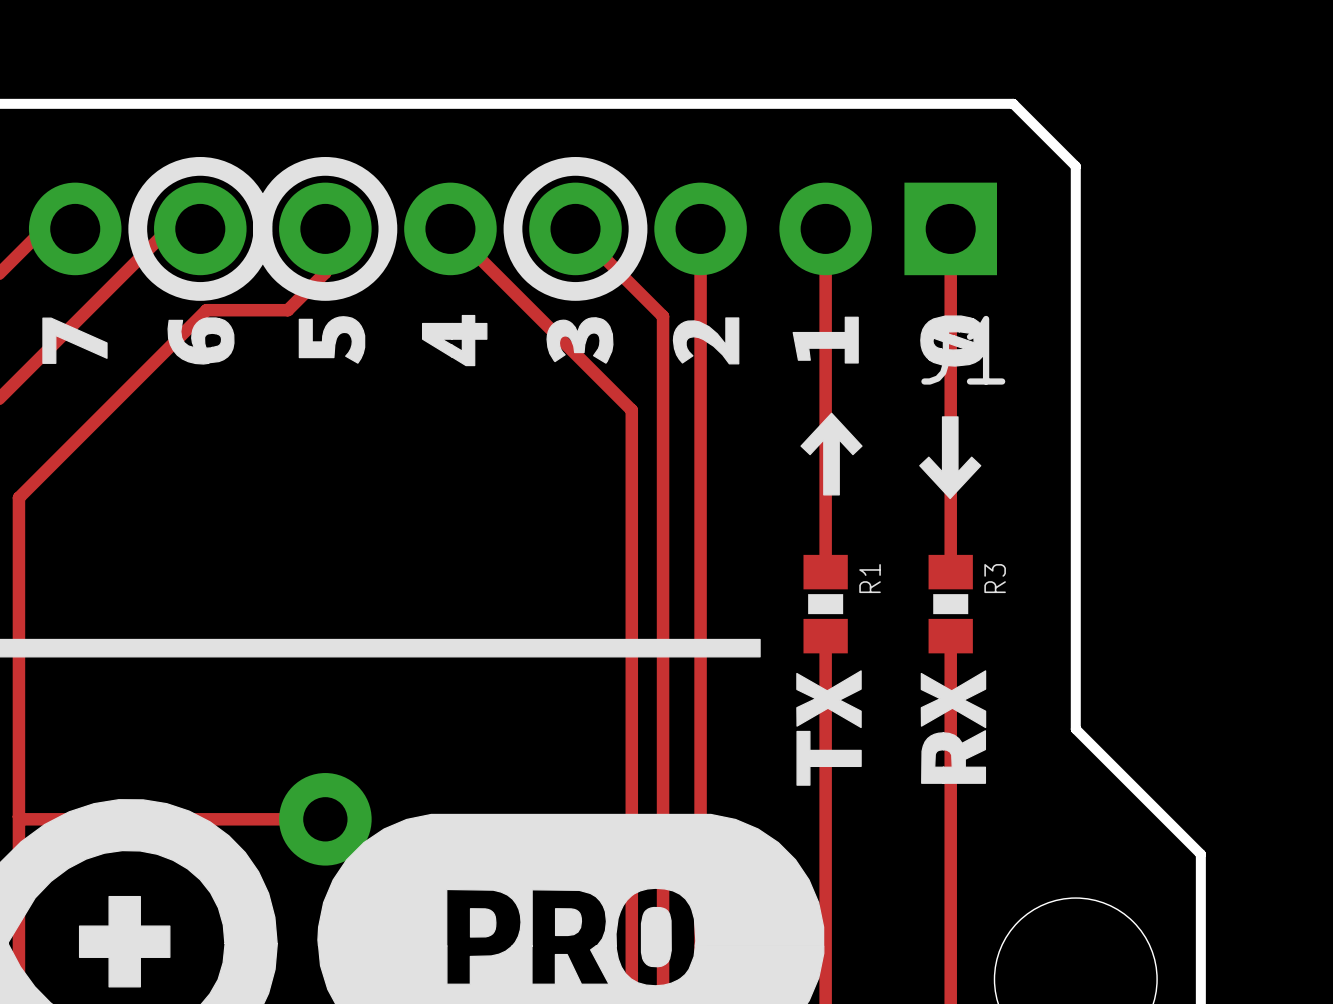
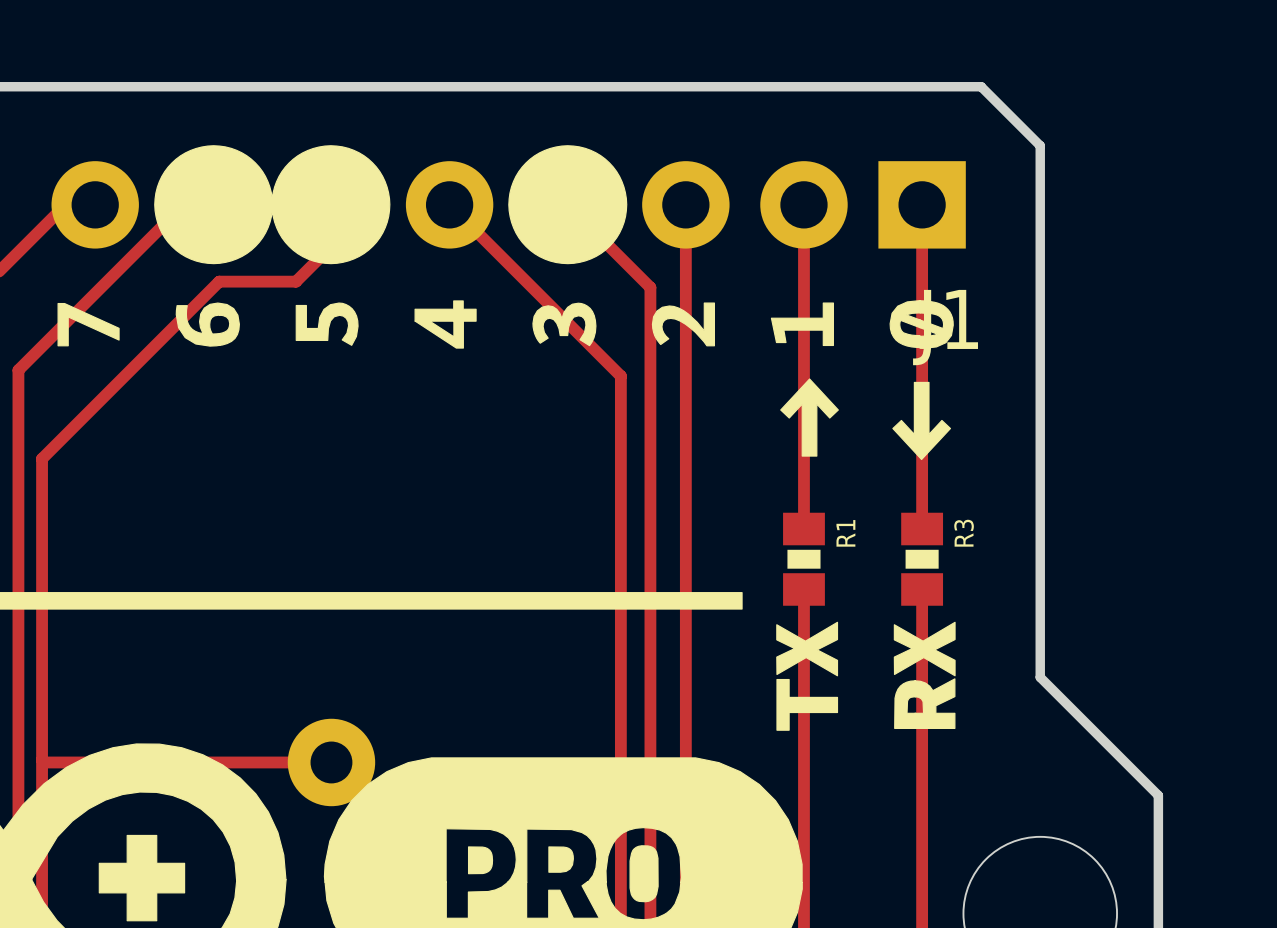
drawing shape: [128, 156, 273, 301] -> [154, 145, 274, 265]
drawing shape: [253, 156, 398, 301] -> [271, 145, 391, 265]
drawing shape: [503, 156, 648, 301] -> [508, 145, 628, 265]
drawing: [451, 314, 488, 367] -> none
drawing: [920, 315, 988, 367] -> none
drawing shape: [298, 316, 366, 364] -> [295, 302, 359, 346]
drawing shape: [792, 316, 859, 364] -> [770, 302, 835, 347]
drawing shape: [42, 317, 108, 364] -> [57, 302, 120, 347]
drawing: [167, 317, 235, 365] -> none
drawing shape: [546, 317, 614, 364] -> [532, 302, 597, 347]
drawing shape: [672, 317, 740, 365] -> [651, 302, 716, 347]
drawing shape: [421, 322, 453, 358] -> [414, 300, 477, 322]
drawing: none -> [889, 300, 954, 349]
drawing: none -> [175, 302, 240, 347]
drawing: none -> [414, 320, 464, 349]

